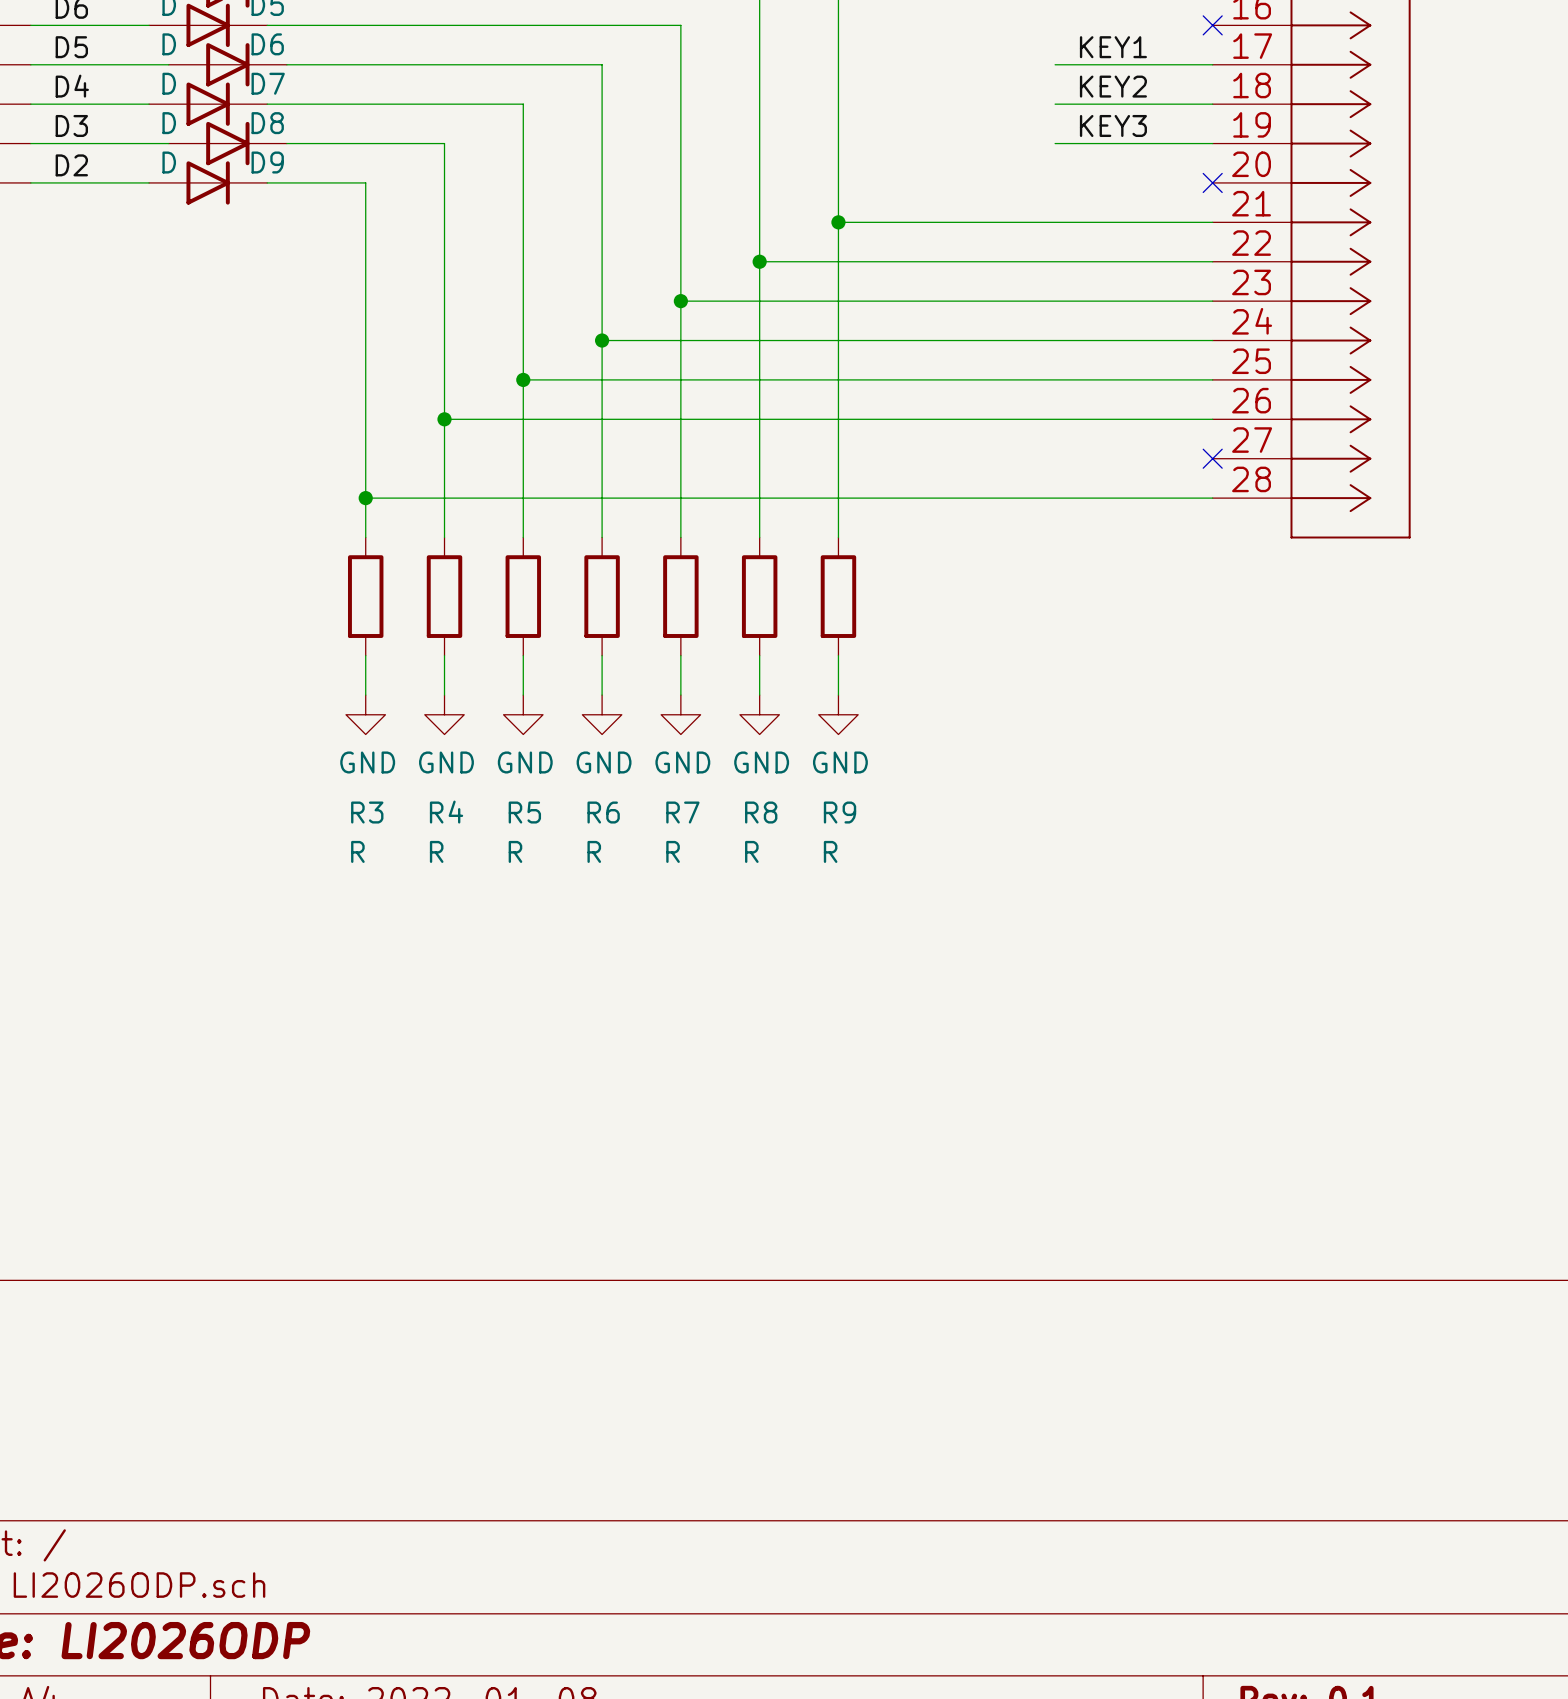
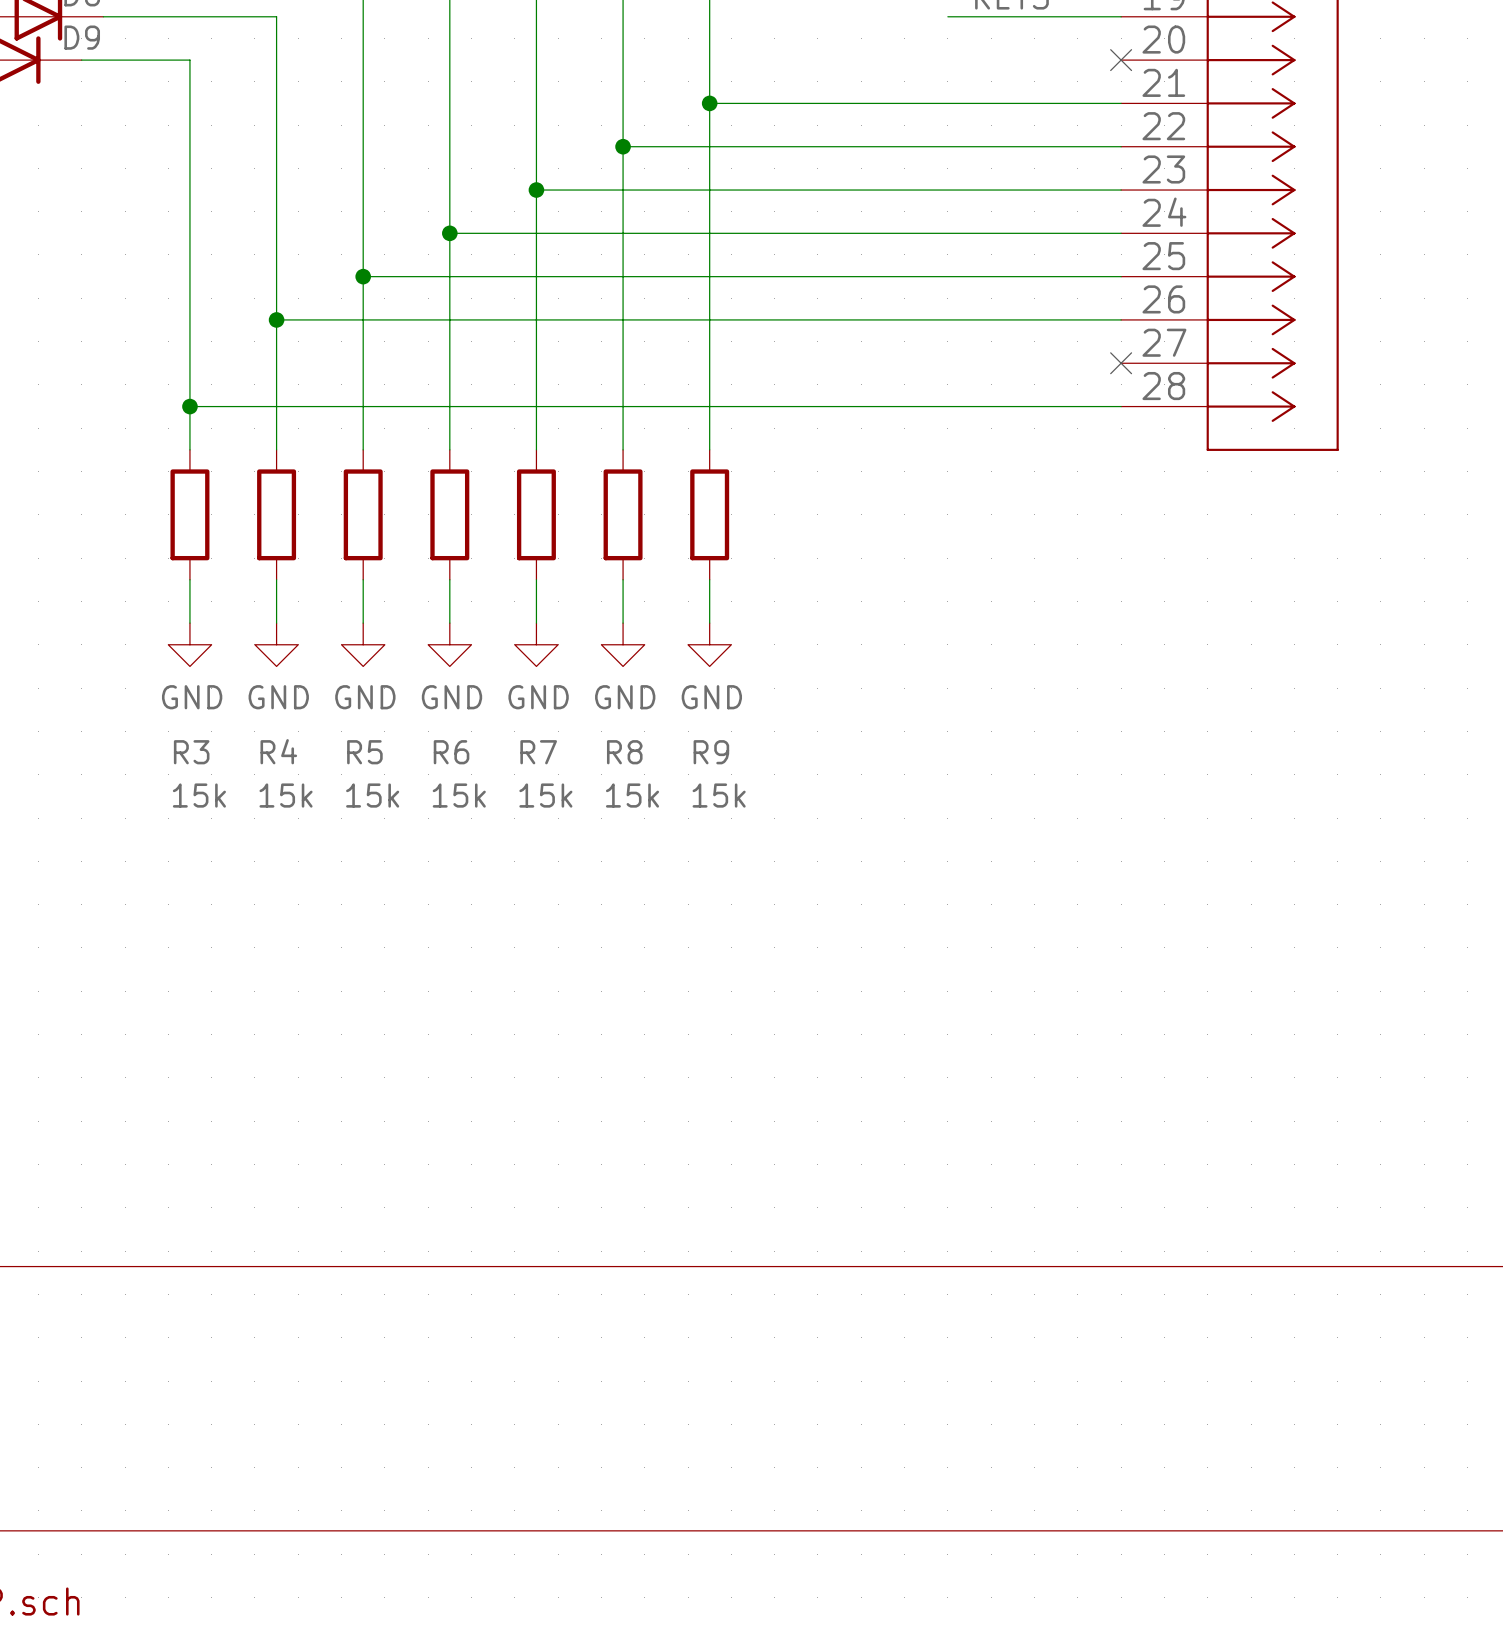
R3 value: R (357, 851) -> 15k (199, 795)
R4 value: R (436, 851) -> 15k (286, 795)
R5 value: R (515, 851) -> 15k (372, 795)
R6 value: R (594, 851) -> 15k (459, 795)
R7 value: R (673, 851) -> 15k (545, 795)
R8 value: R (751, 851) -> 15k (632, 795)
R9 value: R (830, 851) -> 15k (719, 795)

